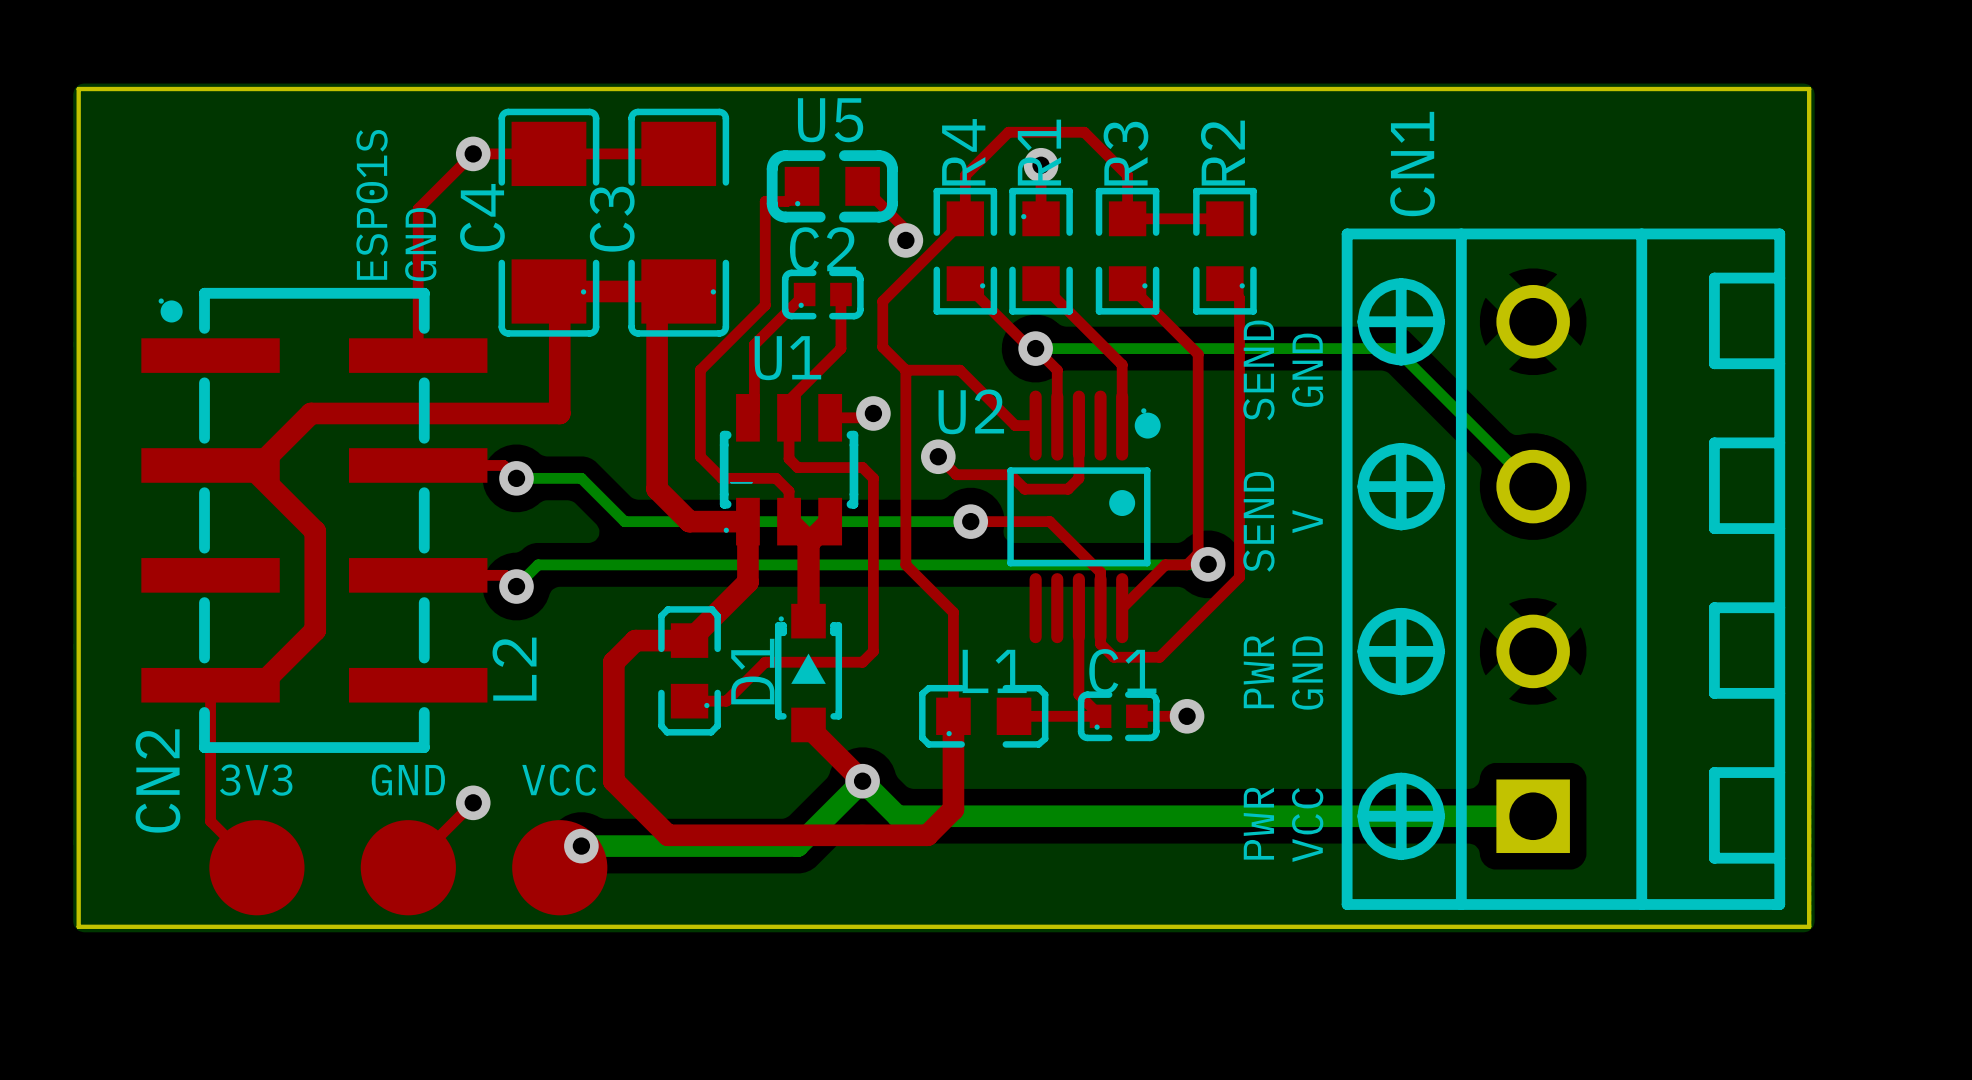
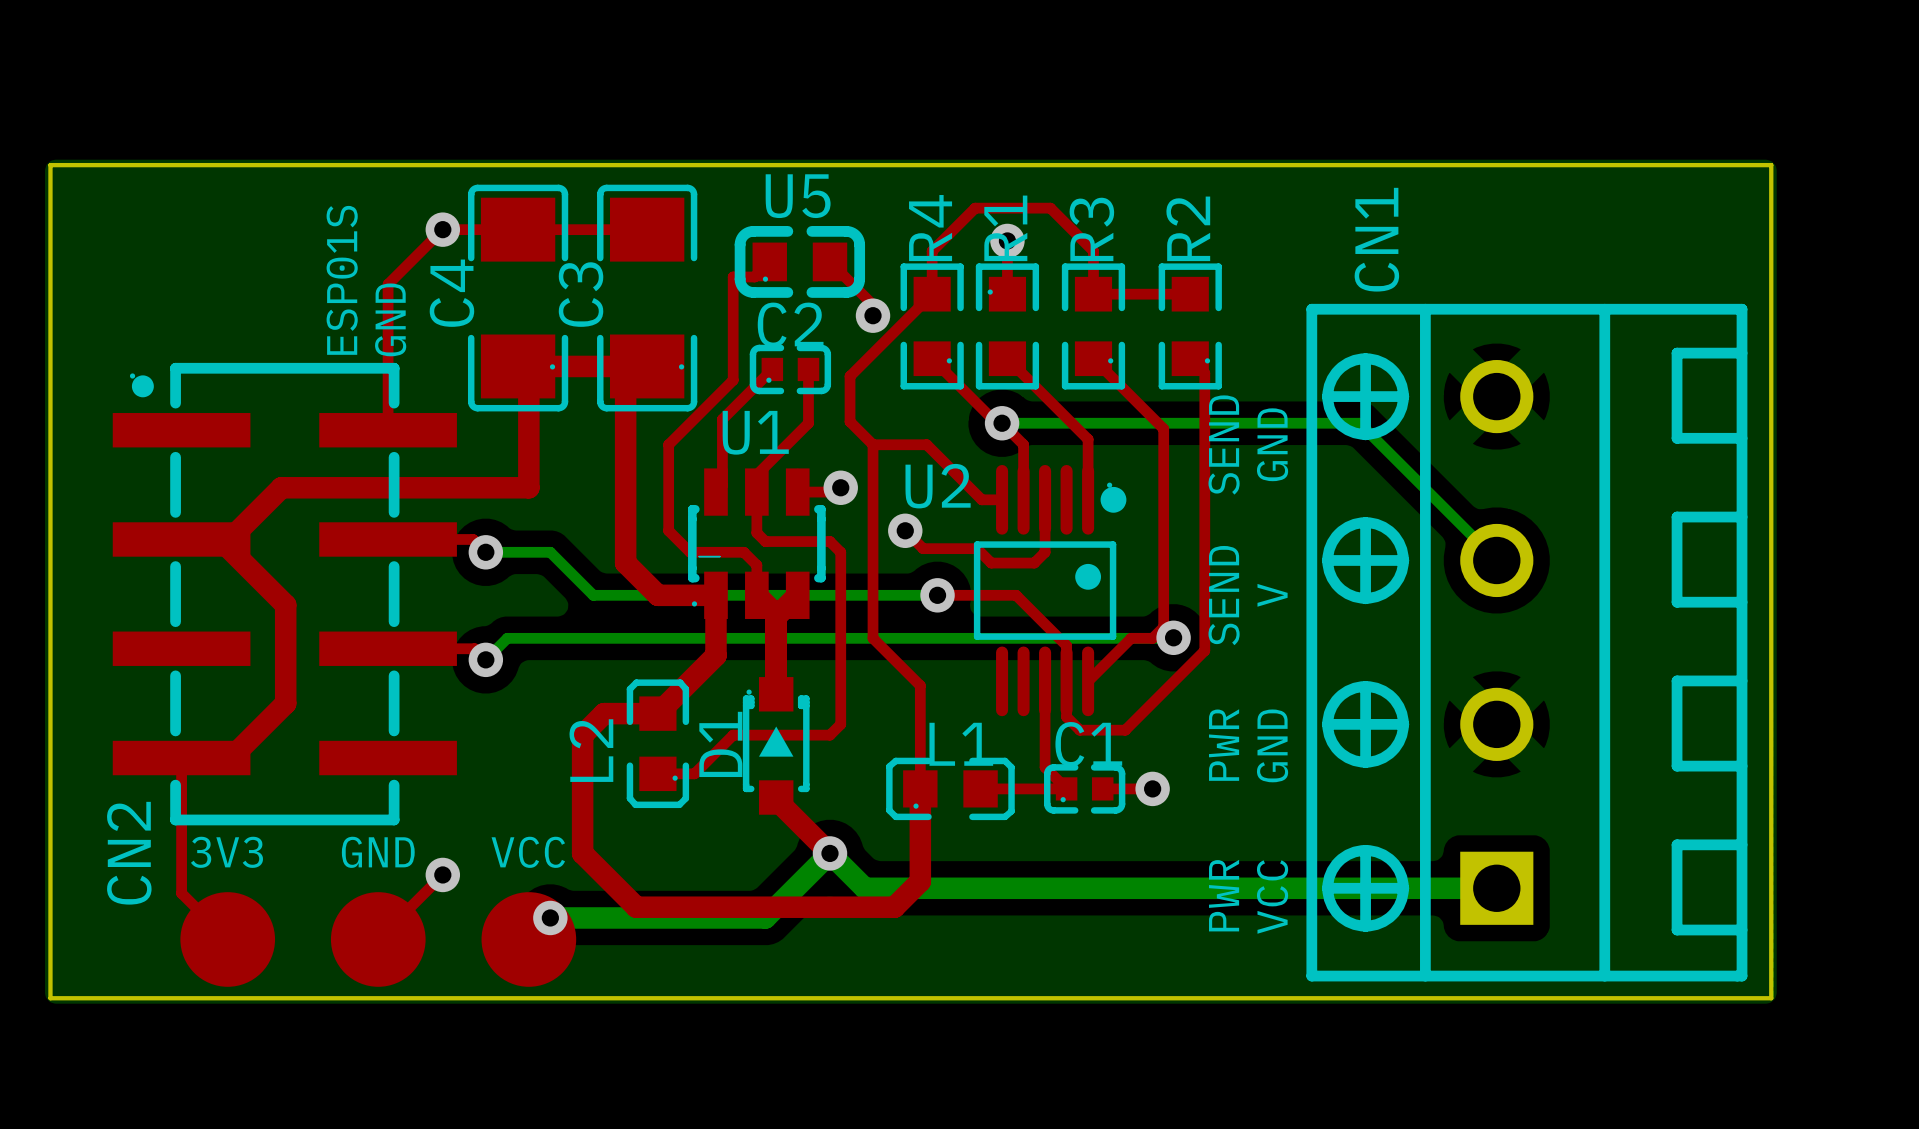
L2 name position: L2 (514, 669) -> L2 (591, 750)

